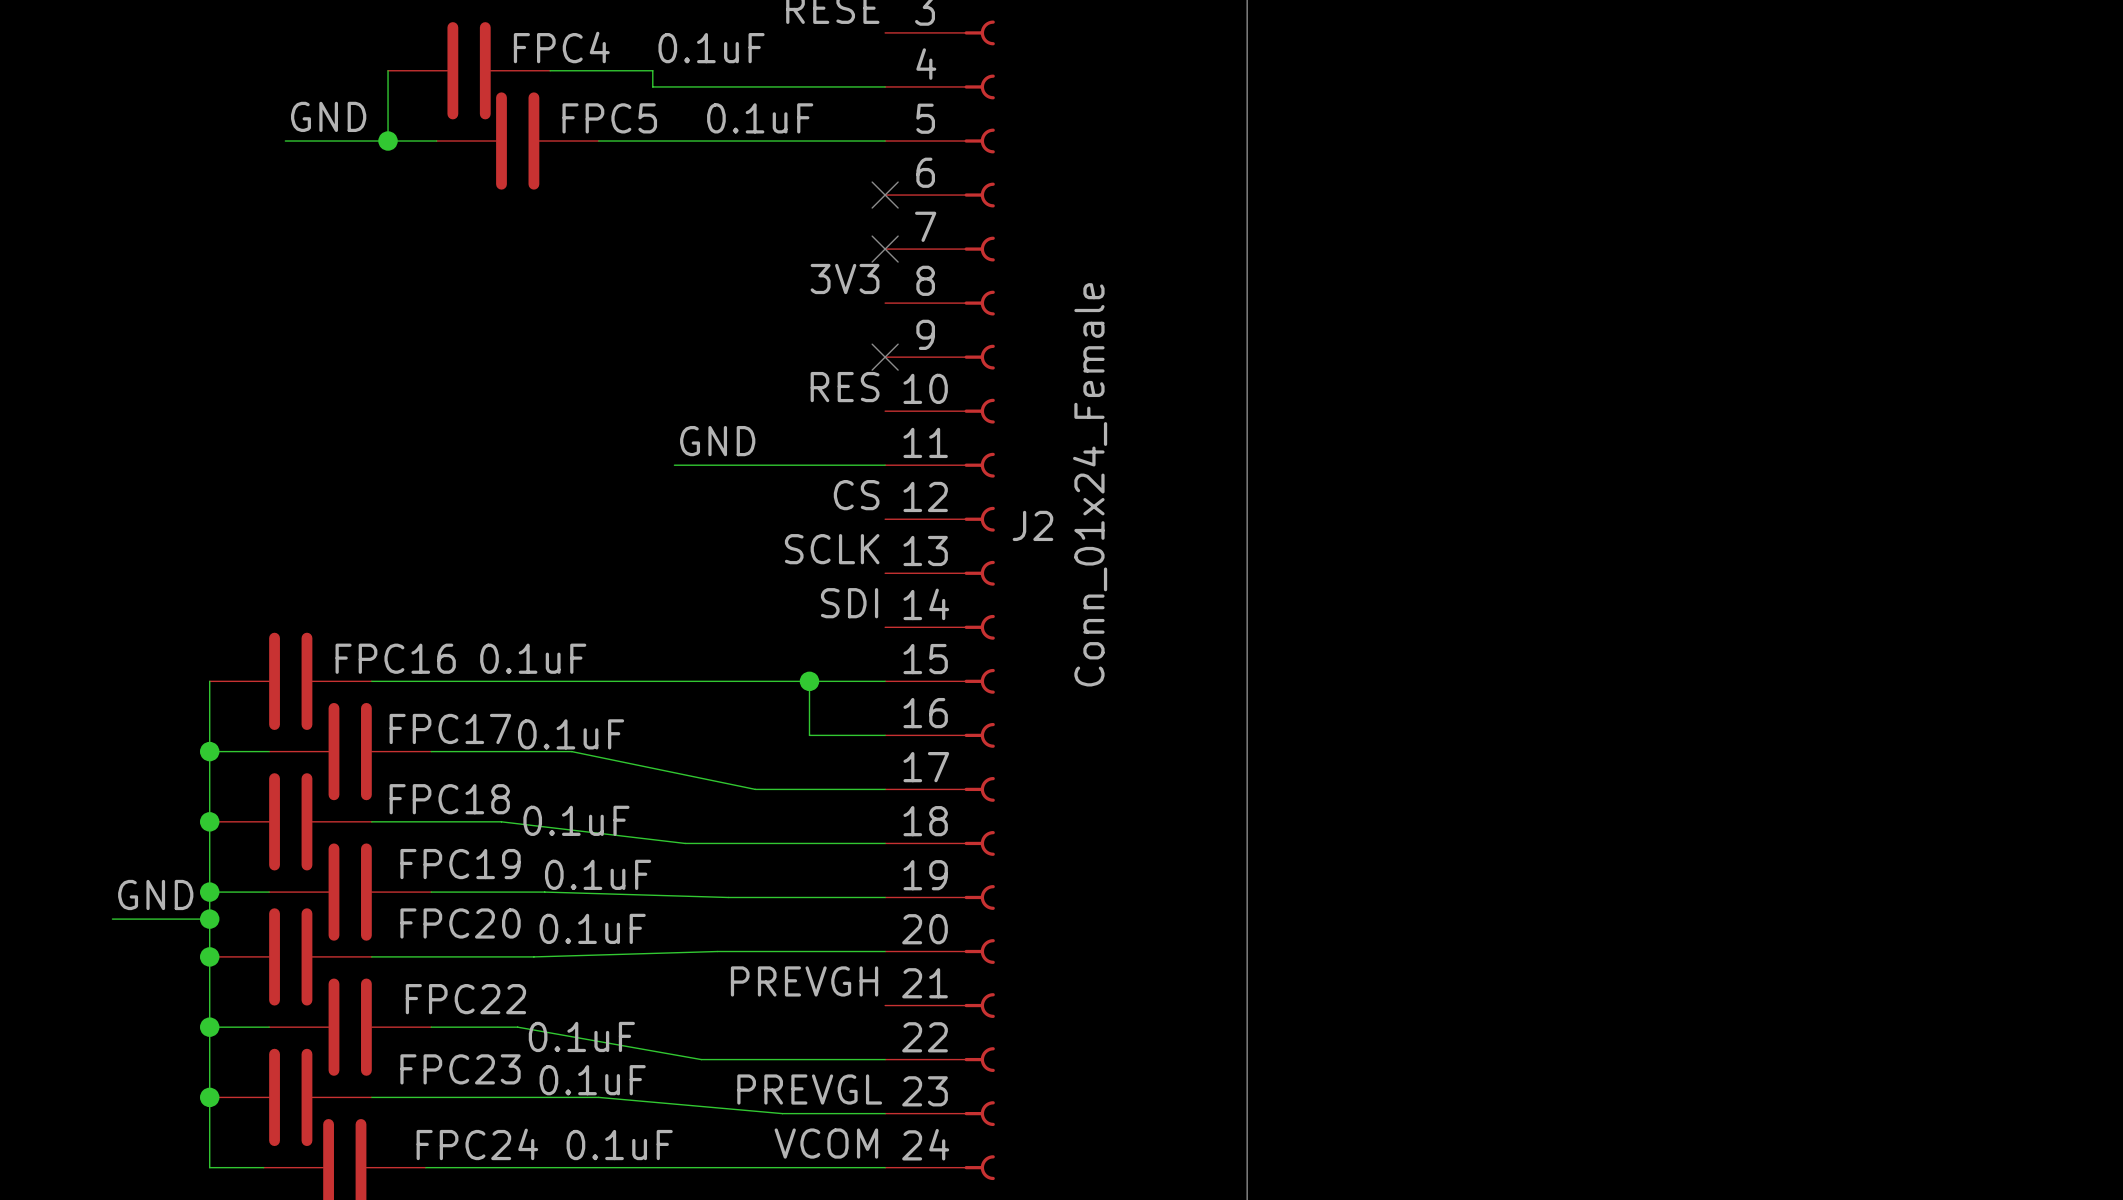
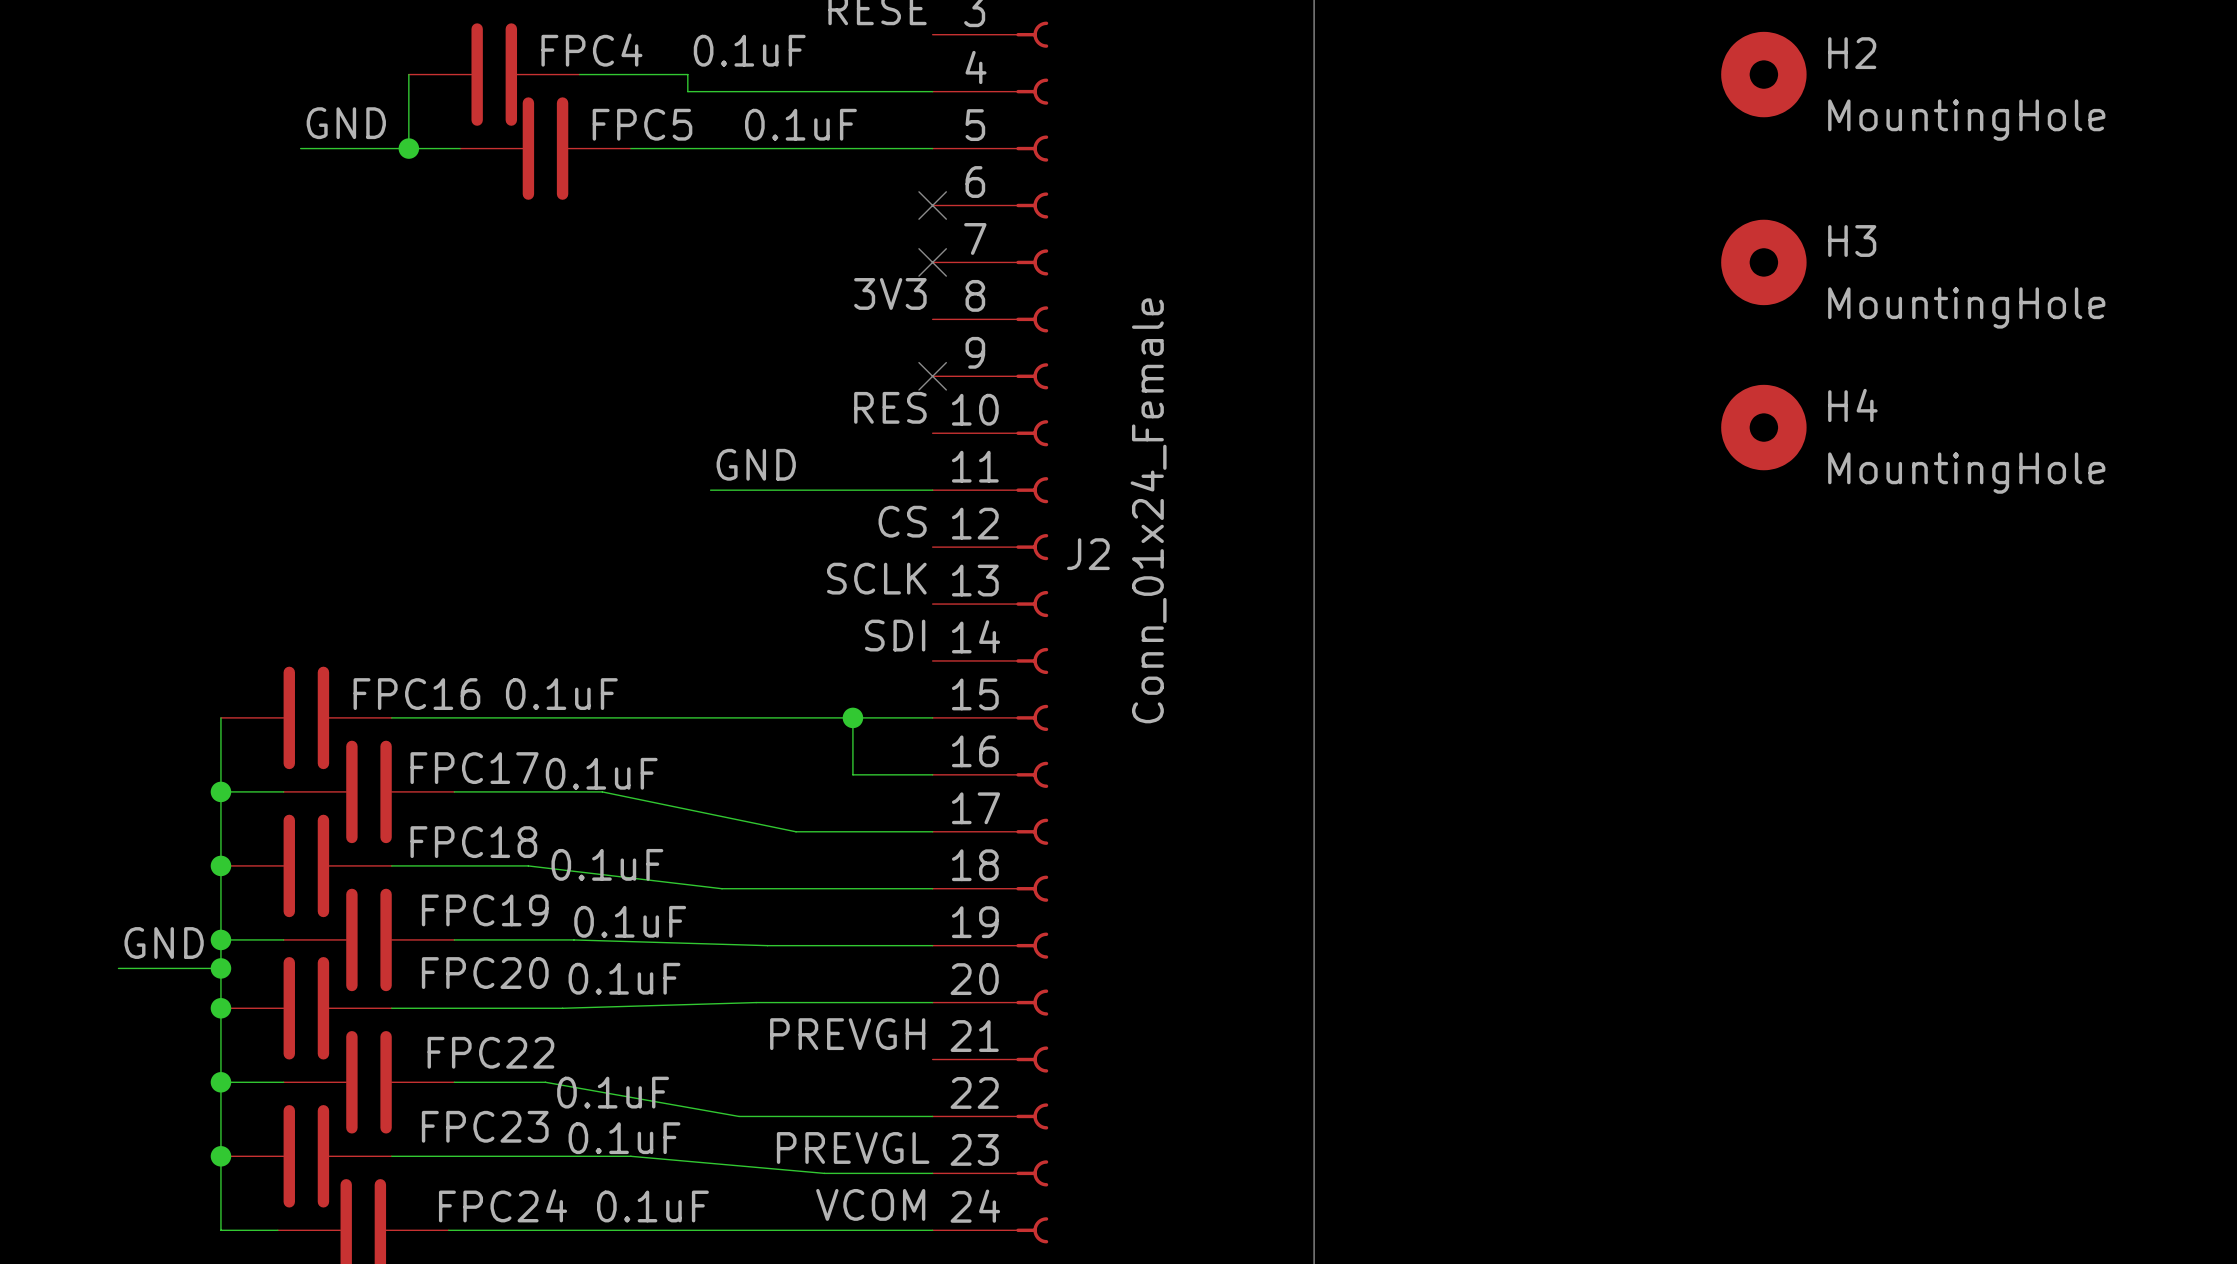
H2: none -> MountingHole (1763, 74)
H3: none -> MountingHole (1763, 262)
H4: none -> MountingHole (1763, 427)

